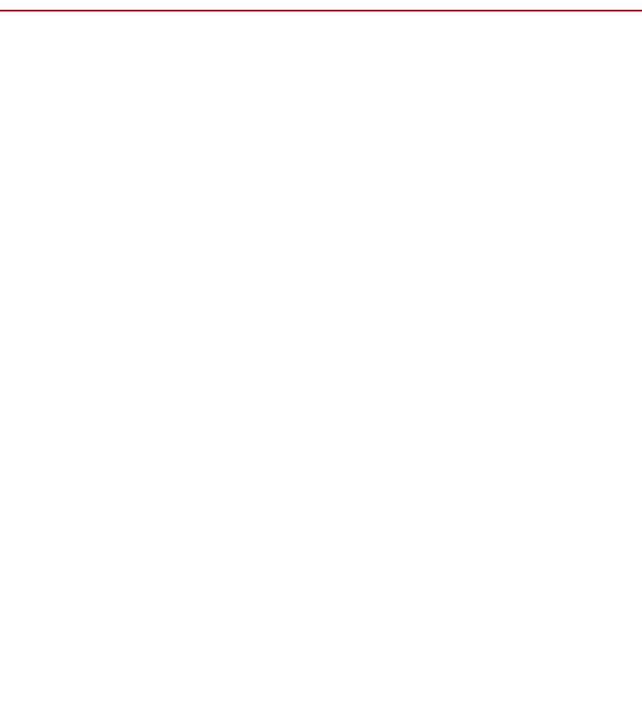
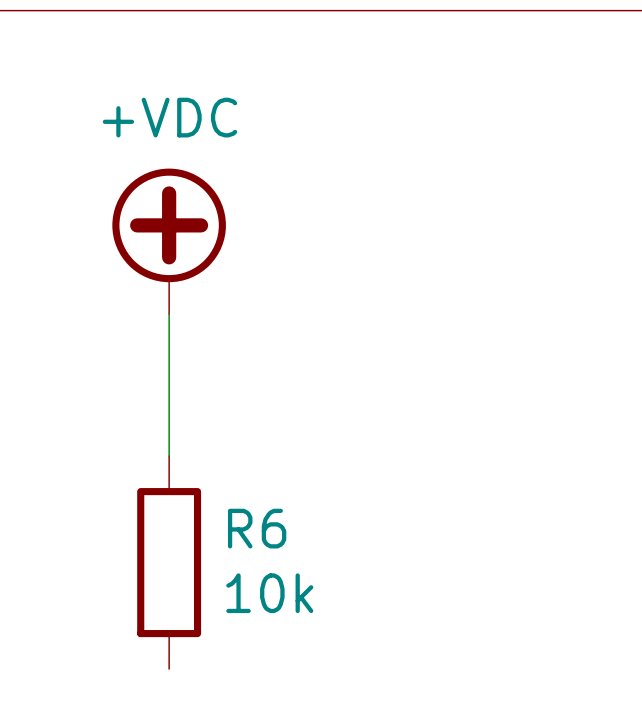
power symbol: none -> +VDC (169, 241)
wire: none -> (169, 314) (169, 456)
R6: none -> 10k (169, 562)

